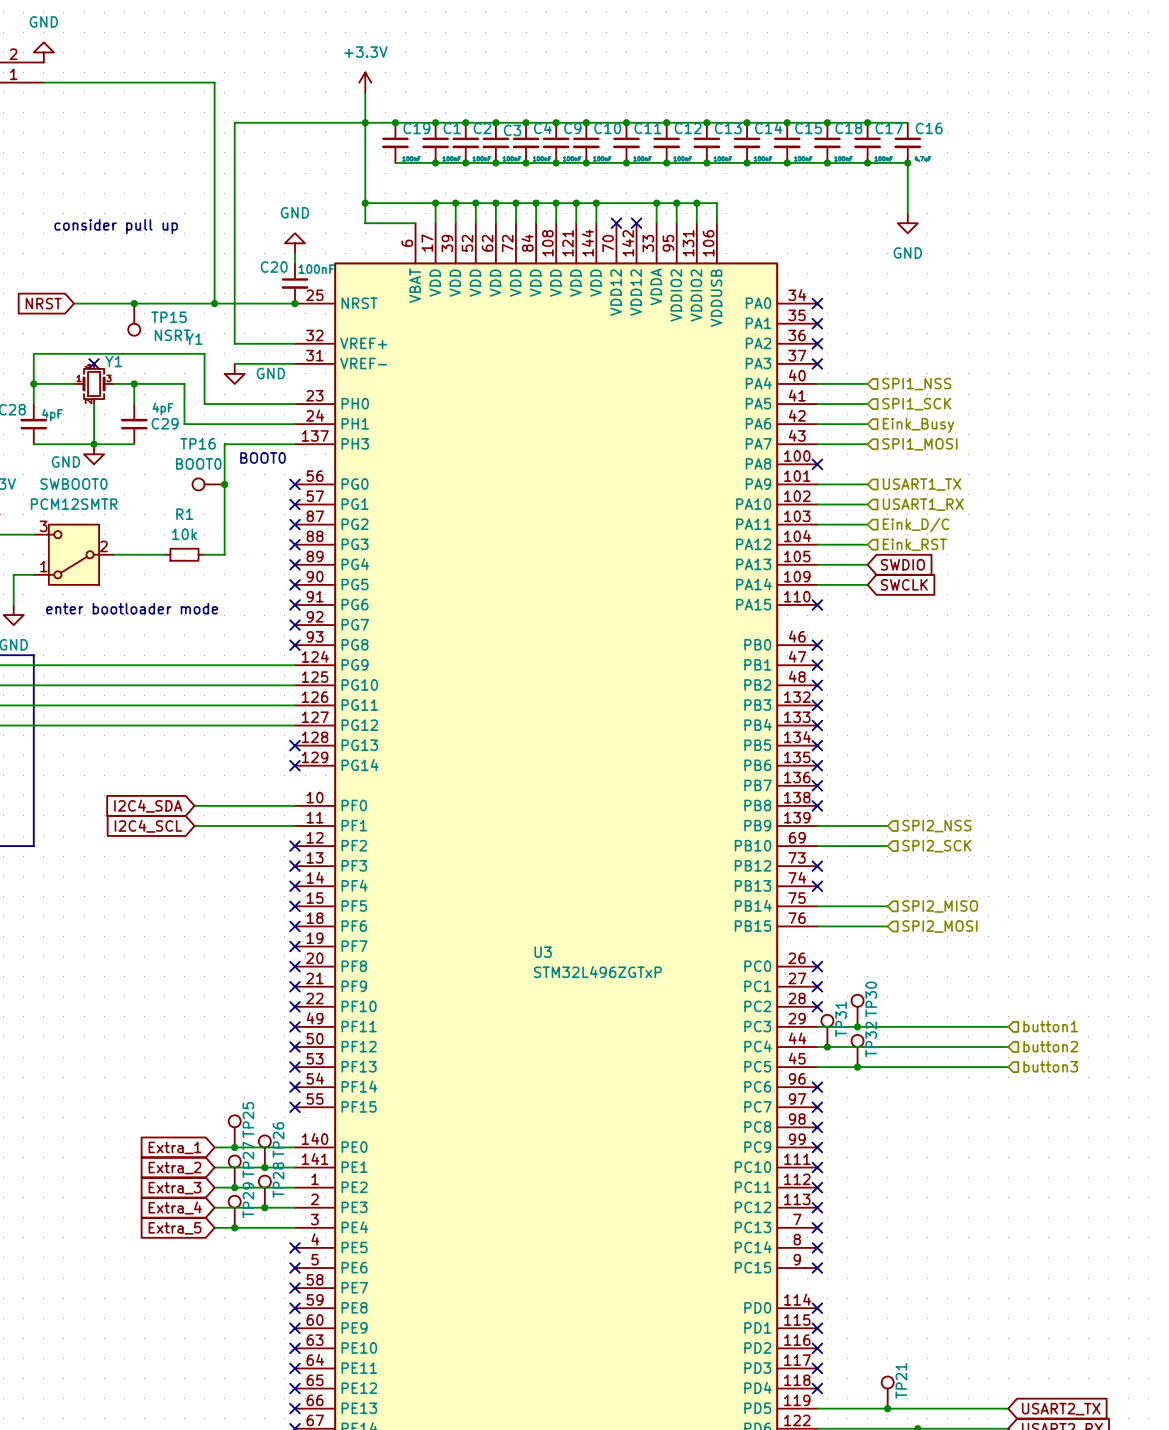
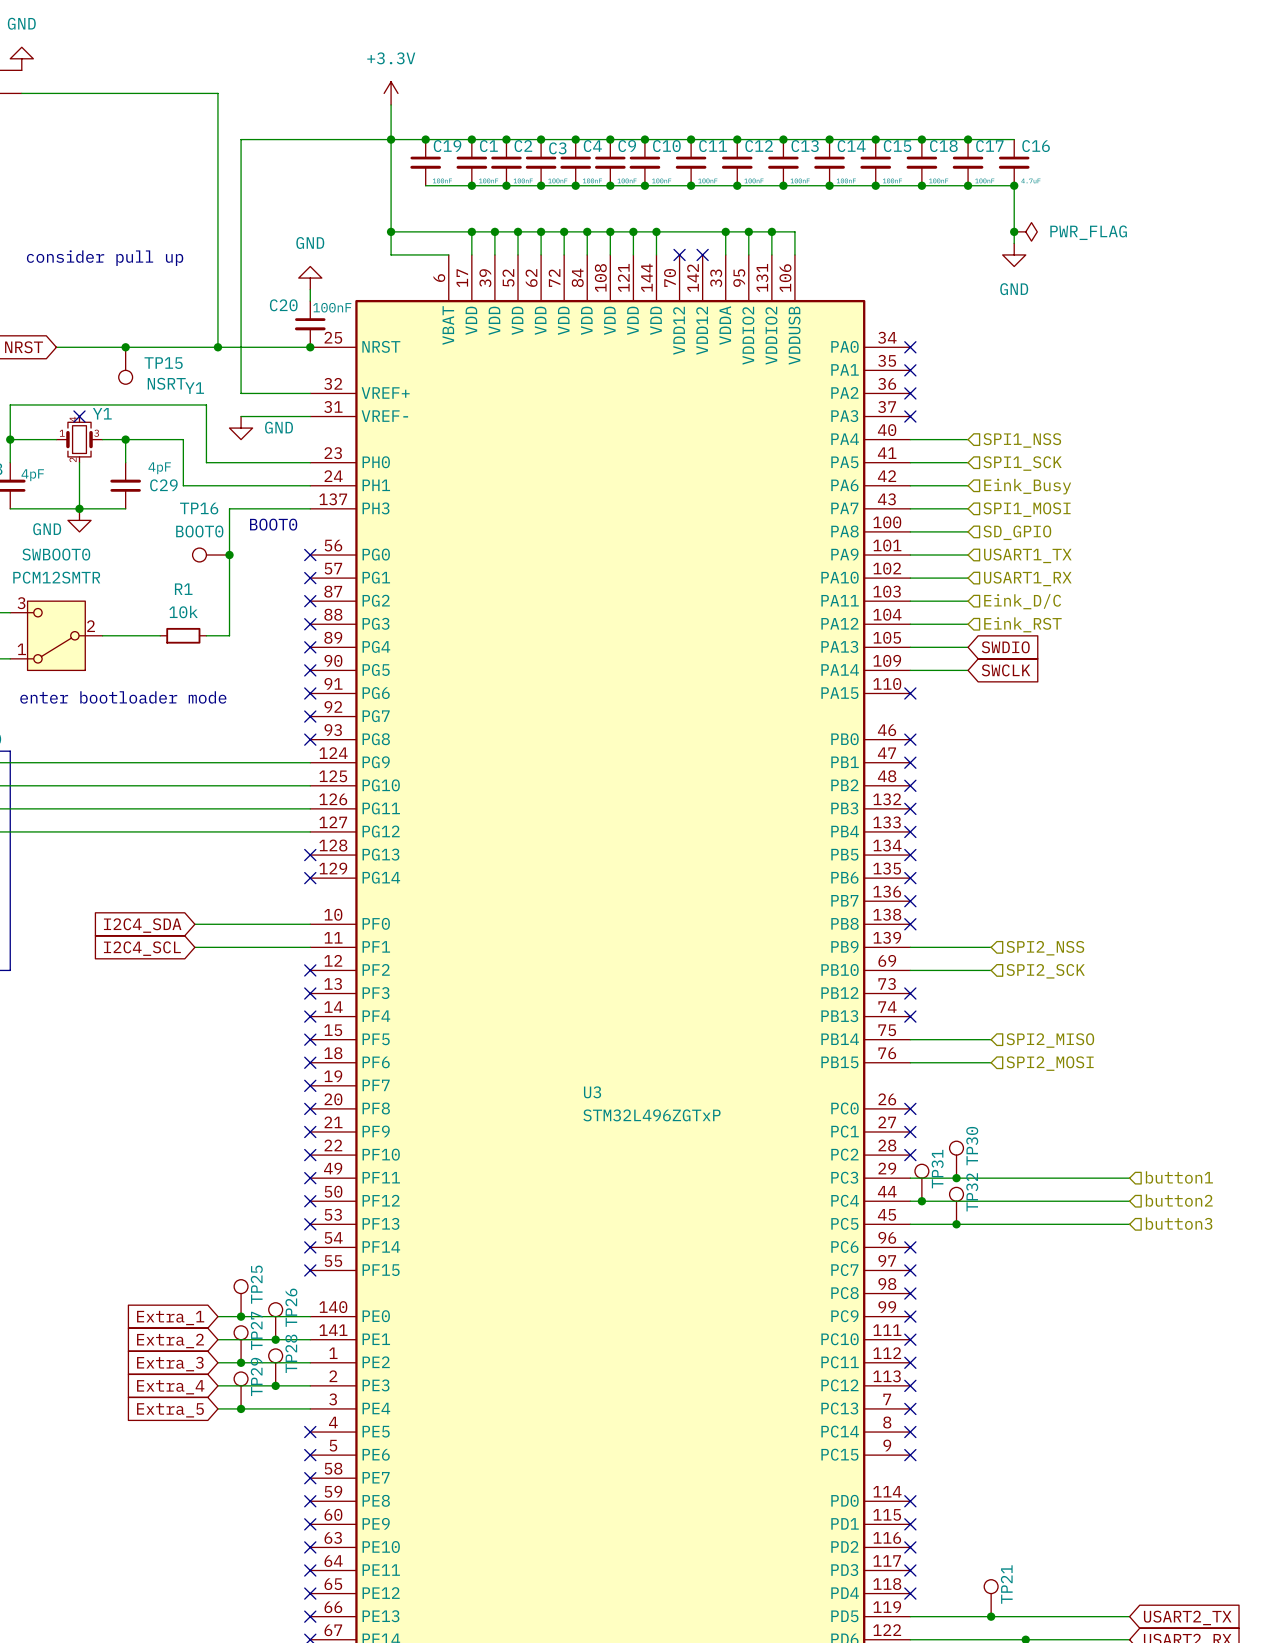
junction: none -> (1014, 231)
power symbol: none -> PWR_FLAG (1025, 231)
wire: none -> (910, 531) (968, 531)
no-connect mark: (817, 464) -> none
hierarchical label: none -> SD_GPIO (1017, 532)

